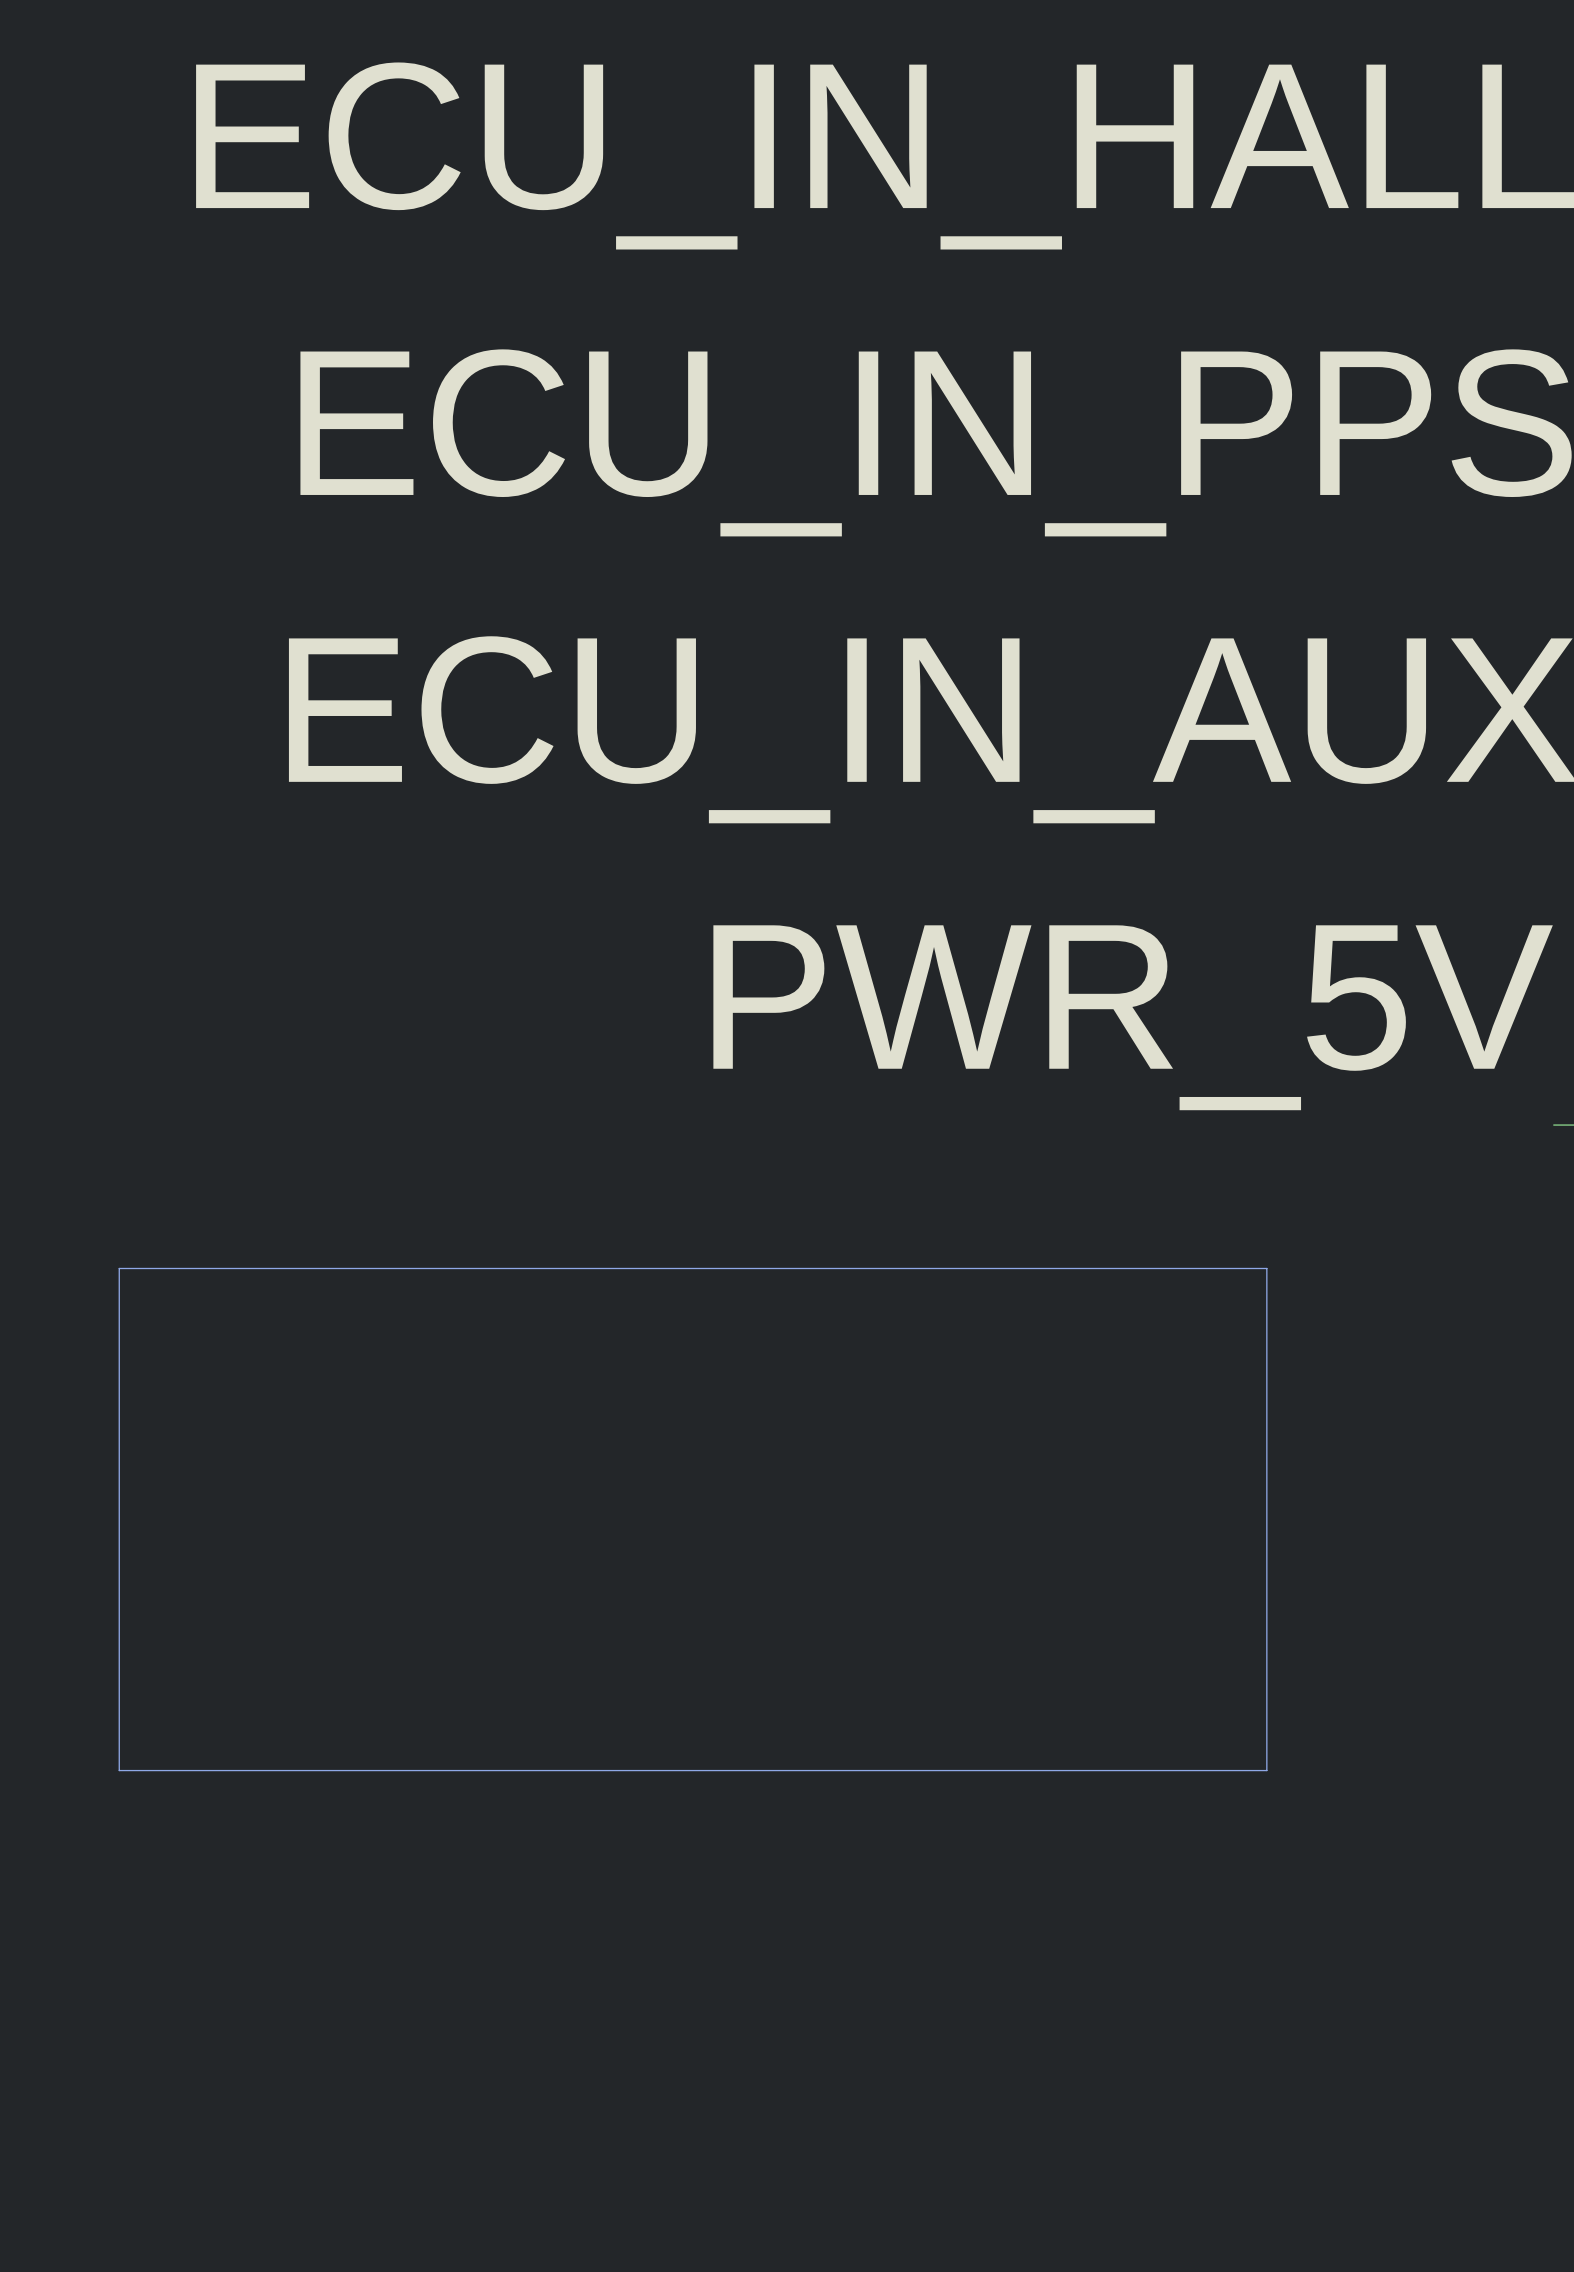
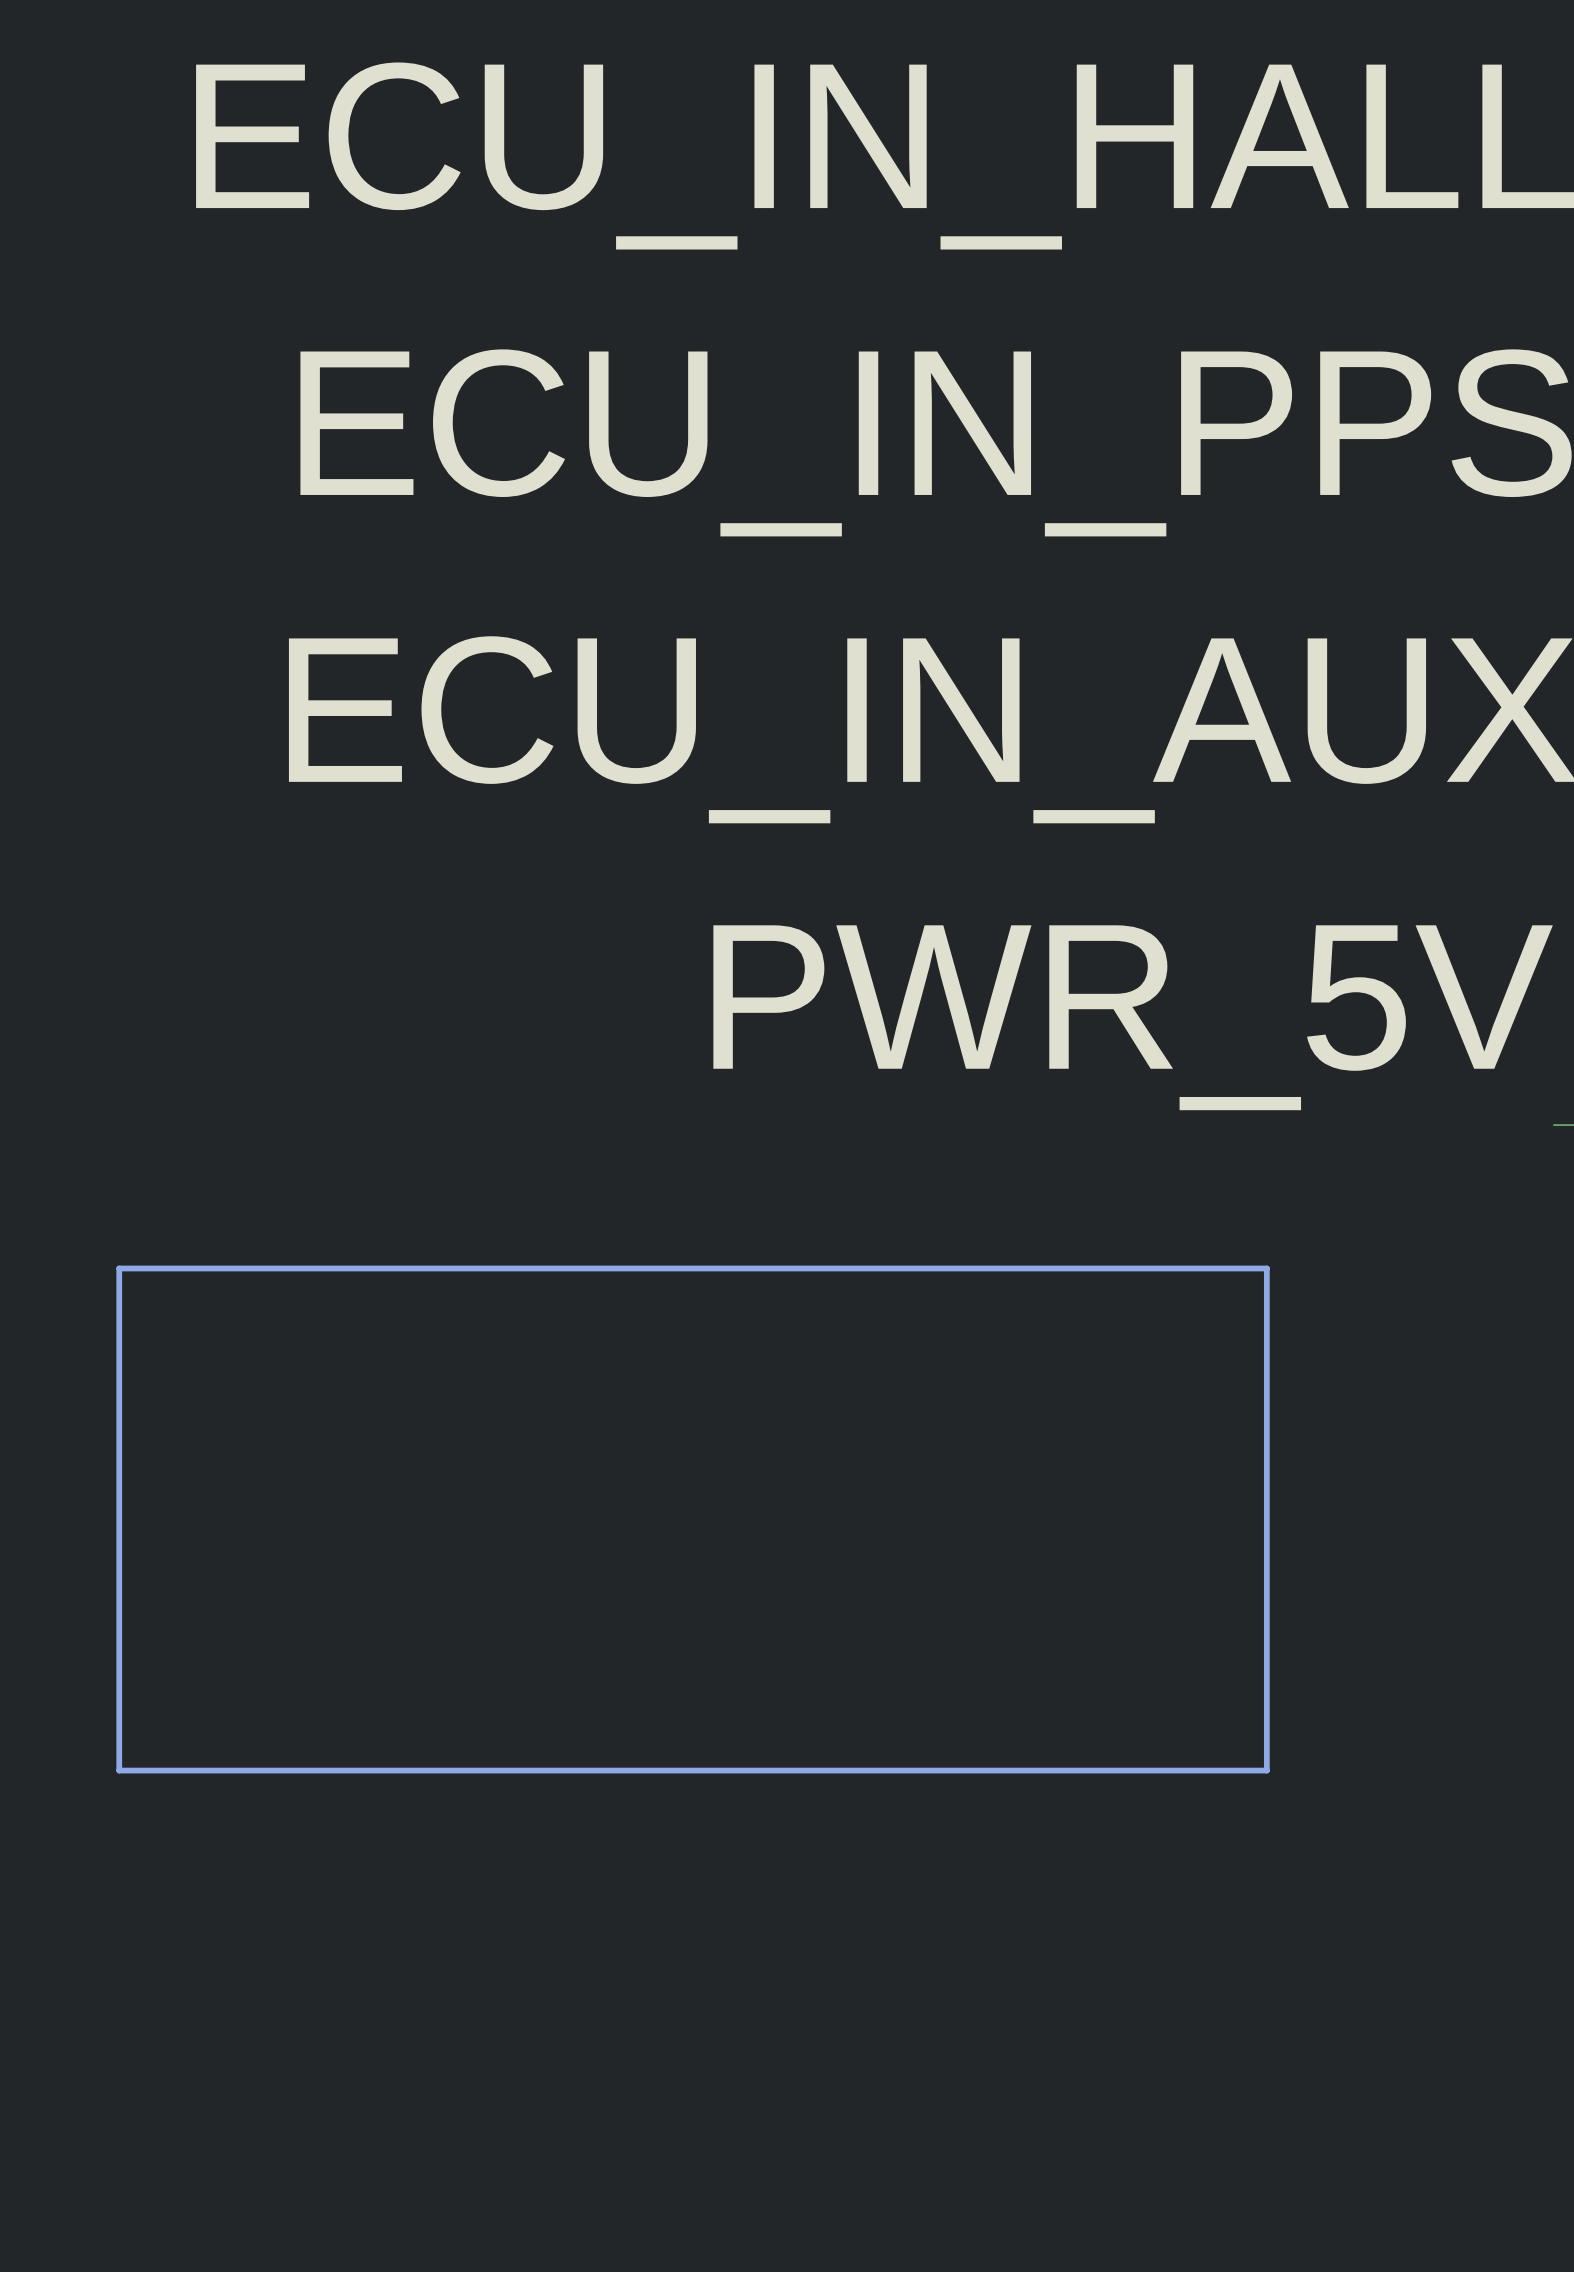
line width: thin (119, 1268) (1266, 1268) (1266, 1770) (119, 1770) (119, 1268) -> thick (119, 1268) (1266, 1268) (1266, 1770) (119, 1770) (119, 1268)

